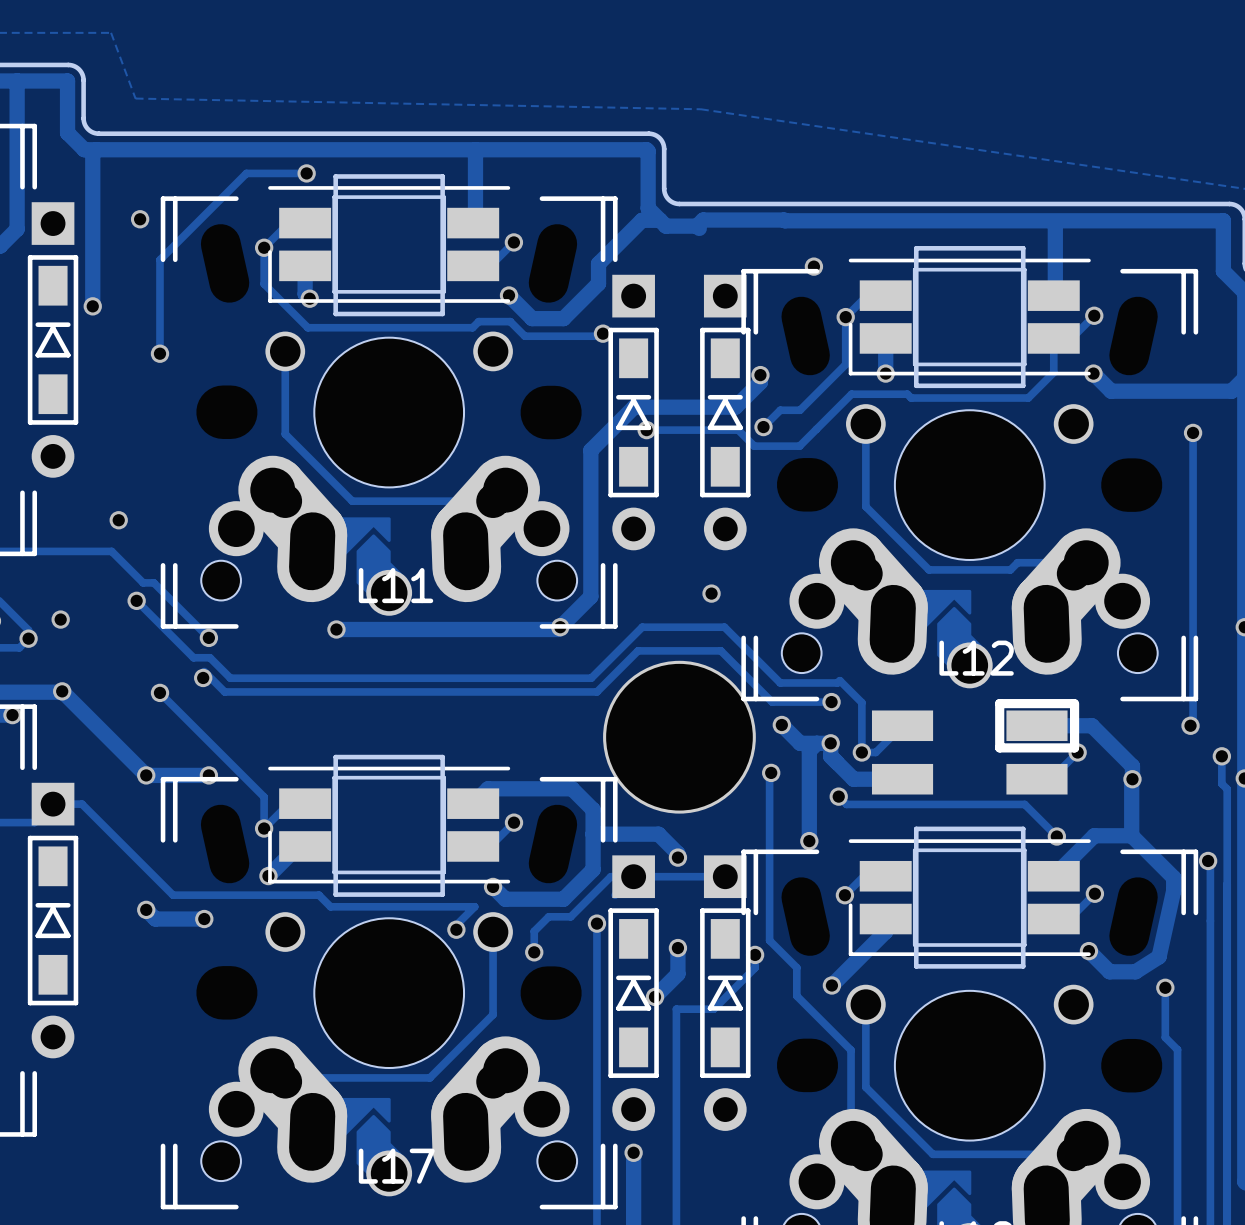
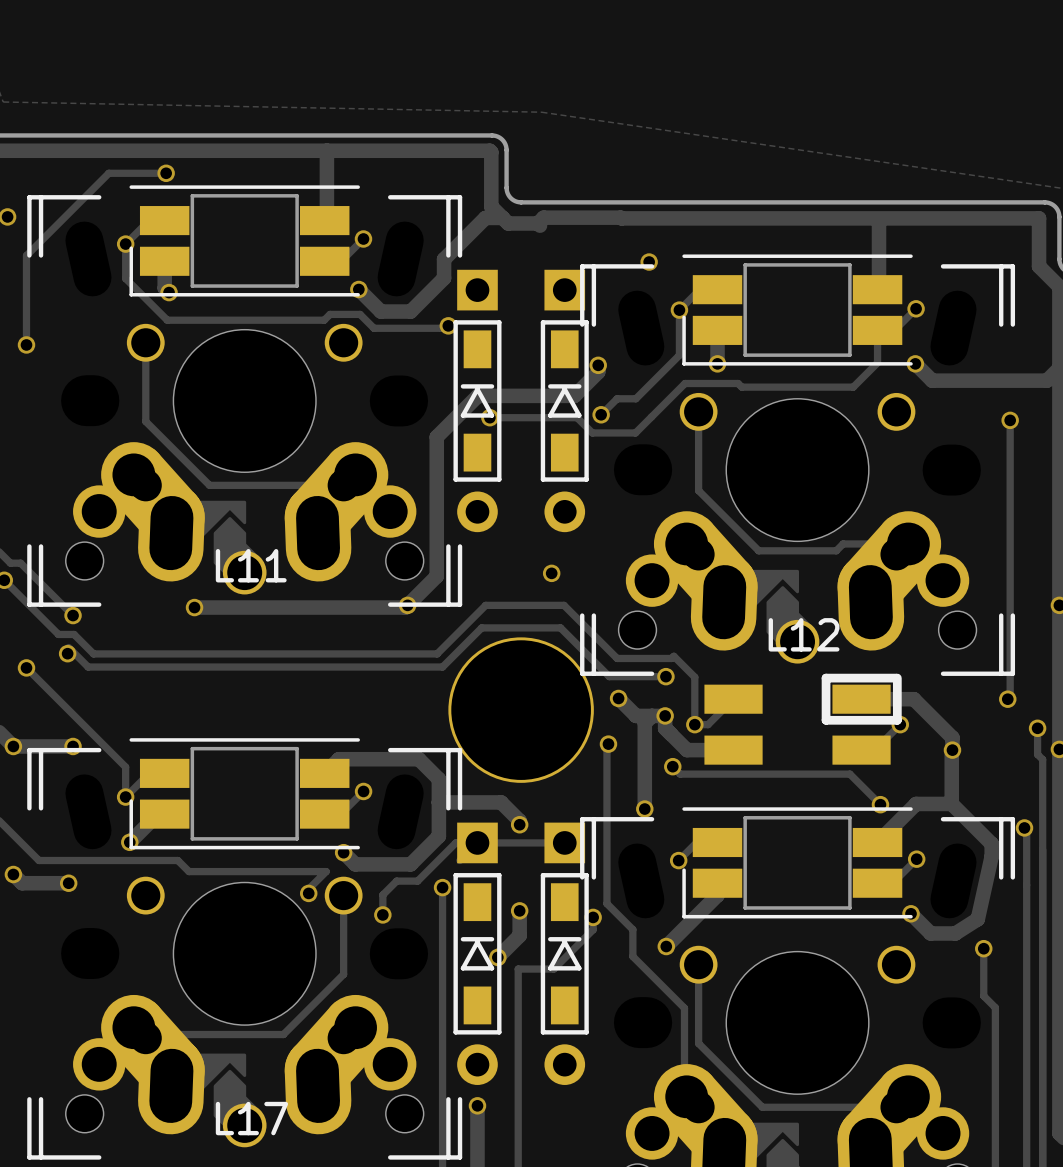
board edge: (335, 176) (335, 313) (442, 313) (442, 176) (335, 176) -> none
board edge: (916, 248) (916, 385) (1023, 385) (1023, 248) (916, 248) -> none
board edge: (335, 757) (442, 757) (442, 894) (335, 894) (335, 757) -> none
board edge: (916, 828) (1023, 828) (1023, 966) (916, 966) (916, 828) -> none

